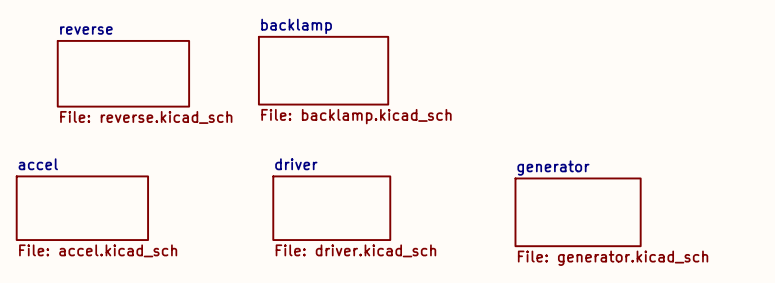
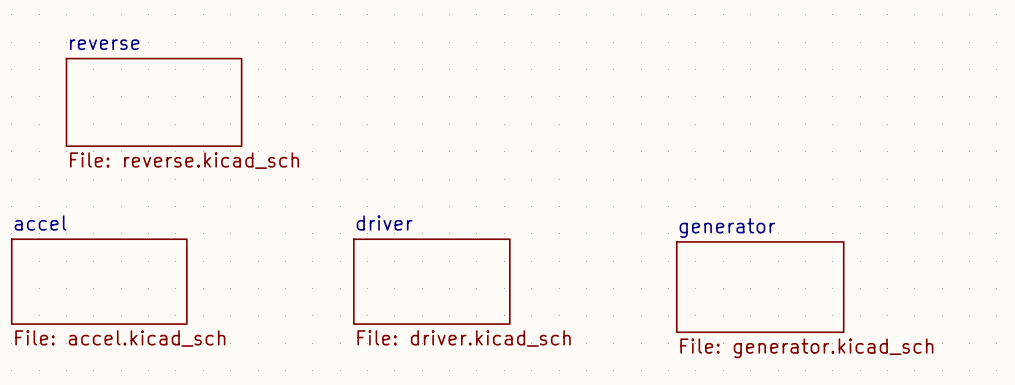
sheet backlamp: File: backlamp.kicad_sch (323, 70) -> none

